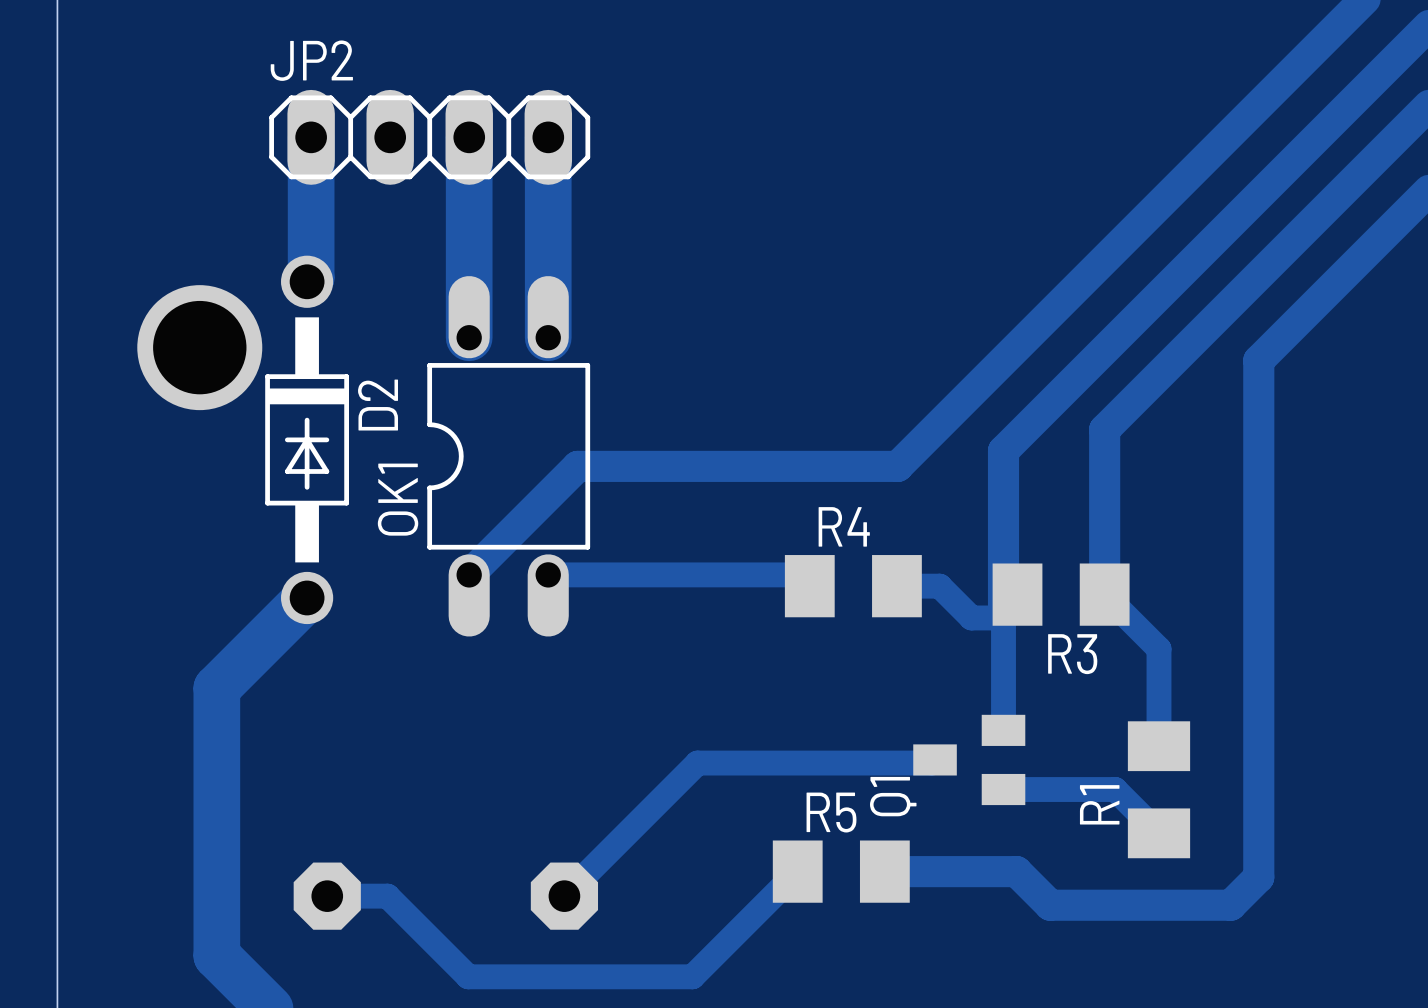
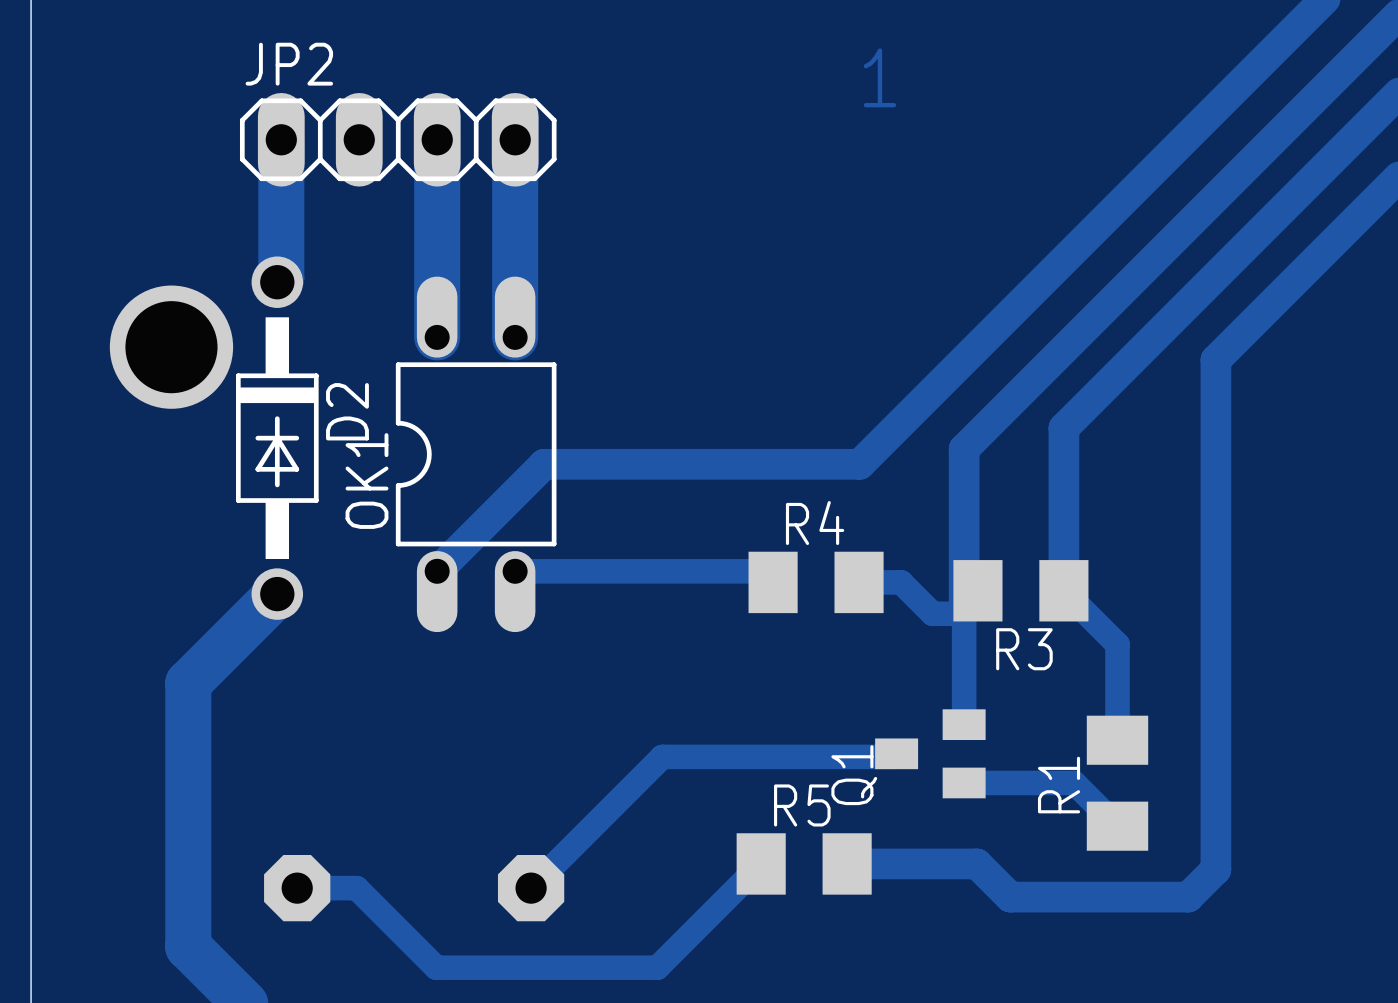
text: none -> 1 (879, 77)

